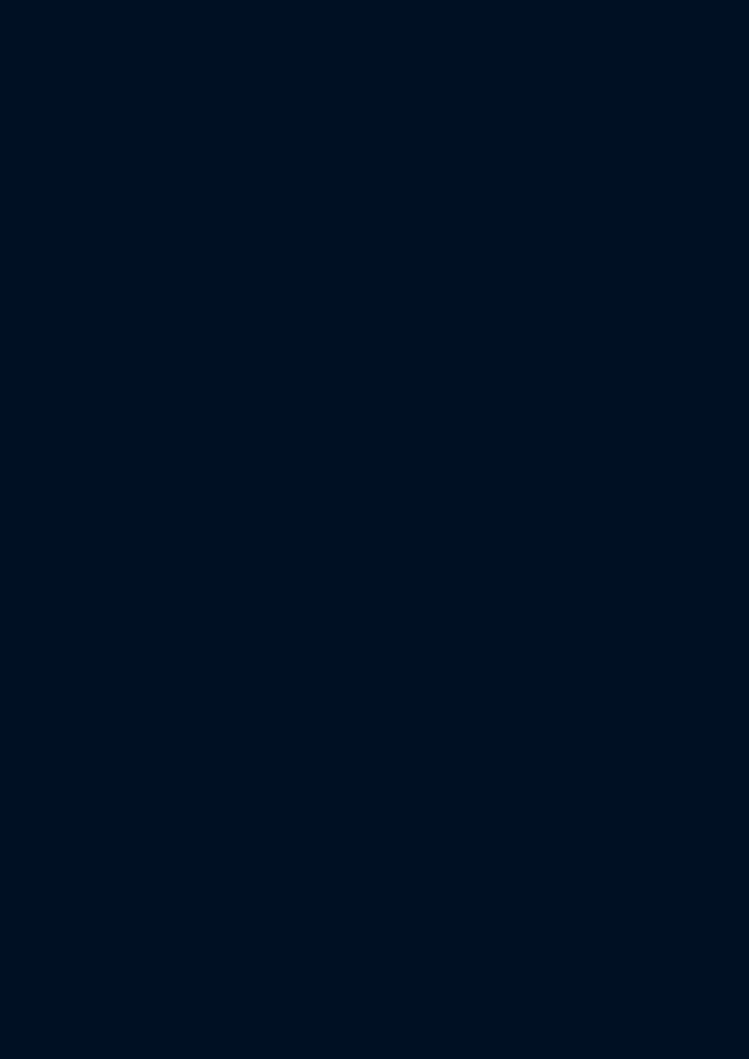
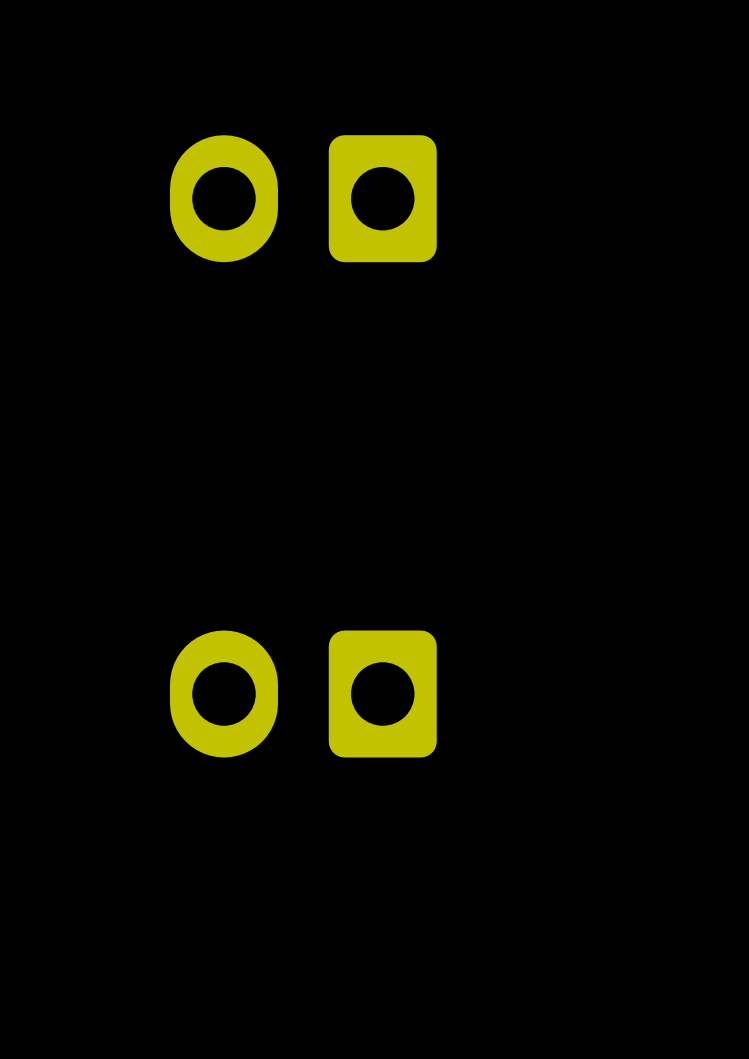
part: none -> (303, 198)
part: none -> (303, 693)

